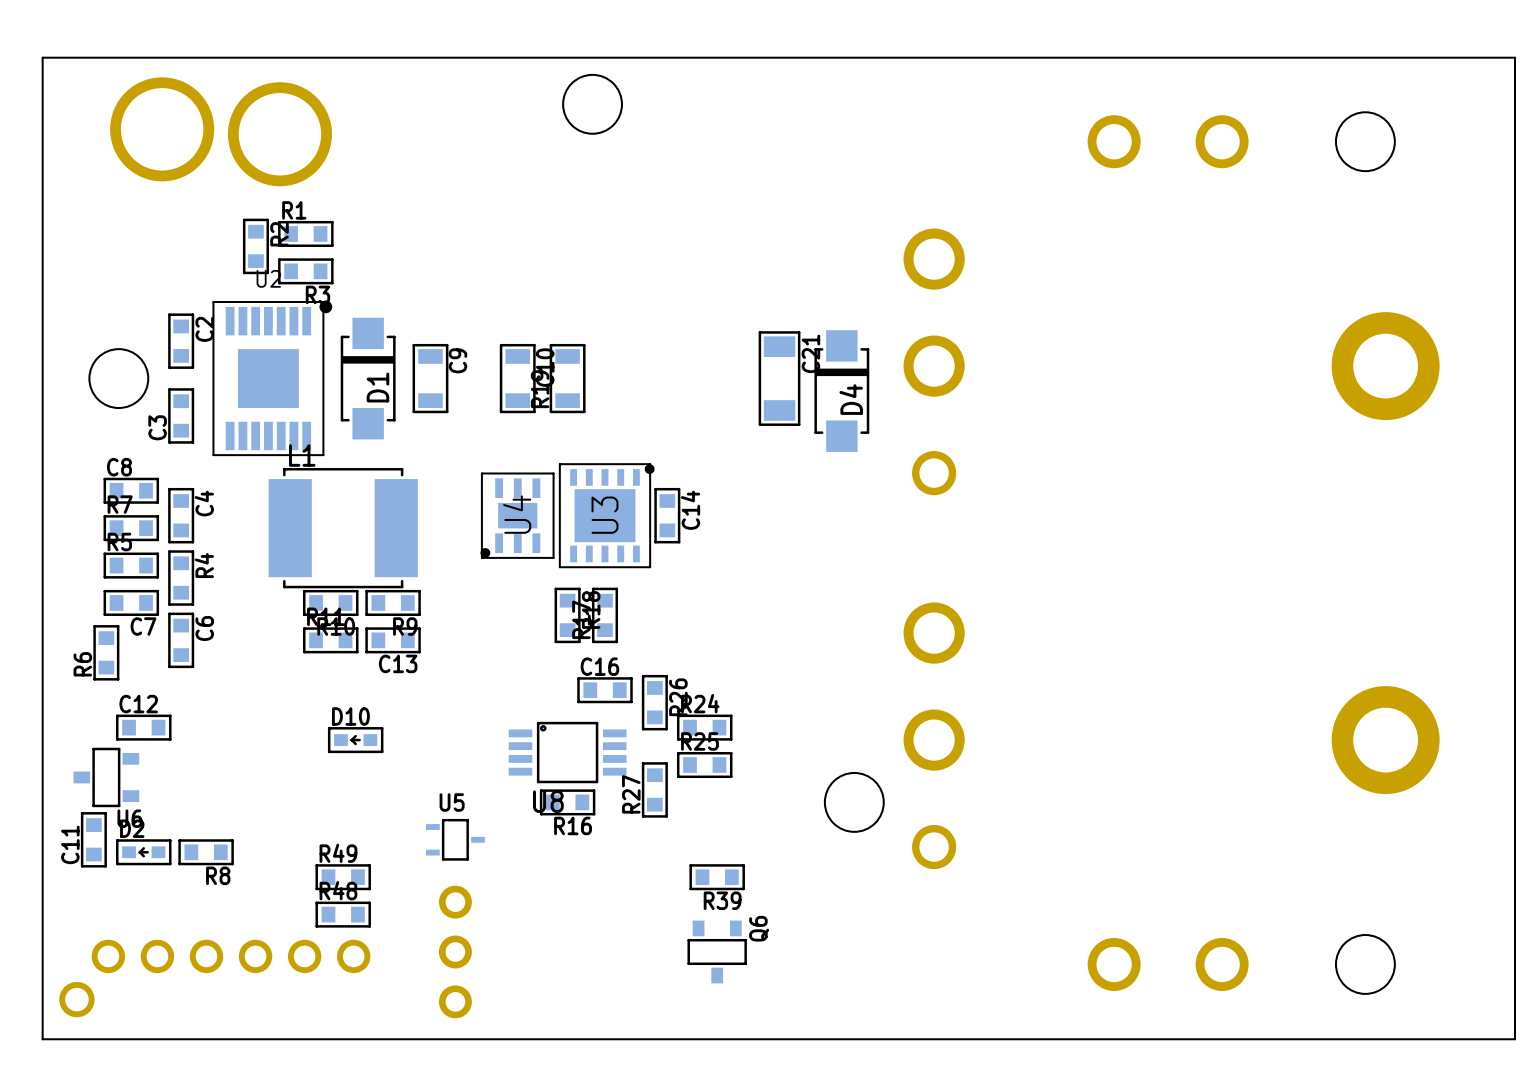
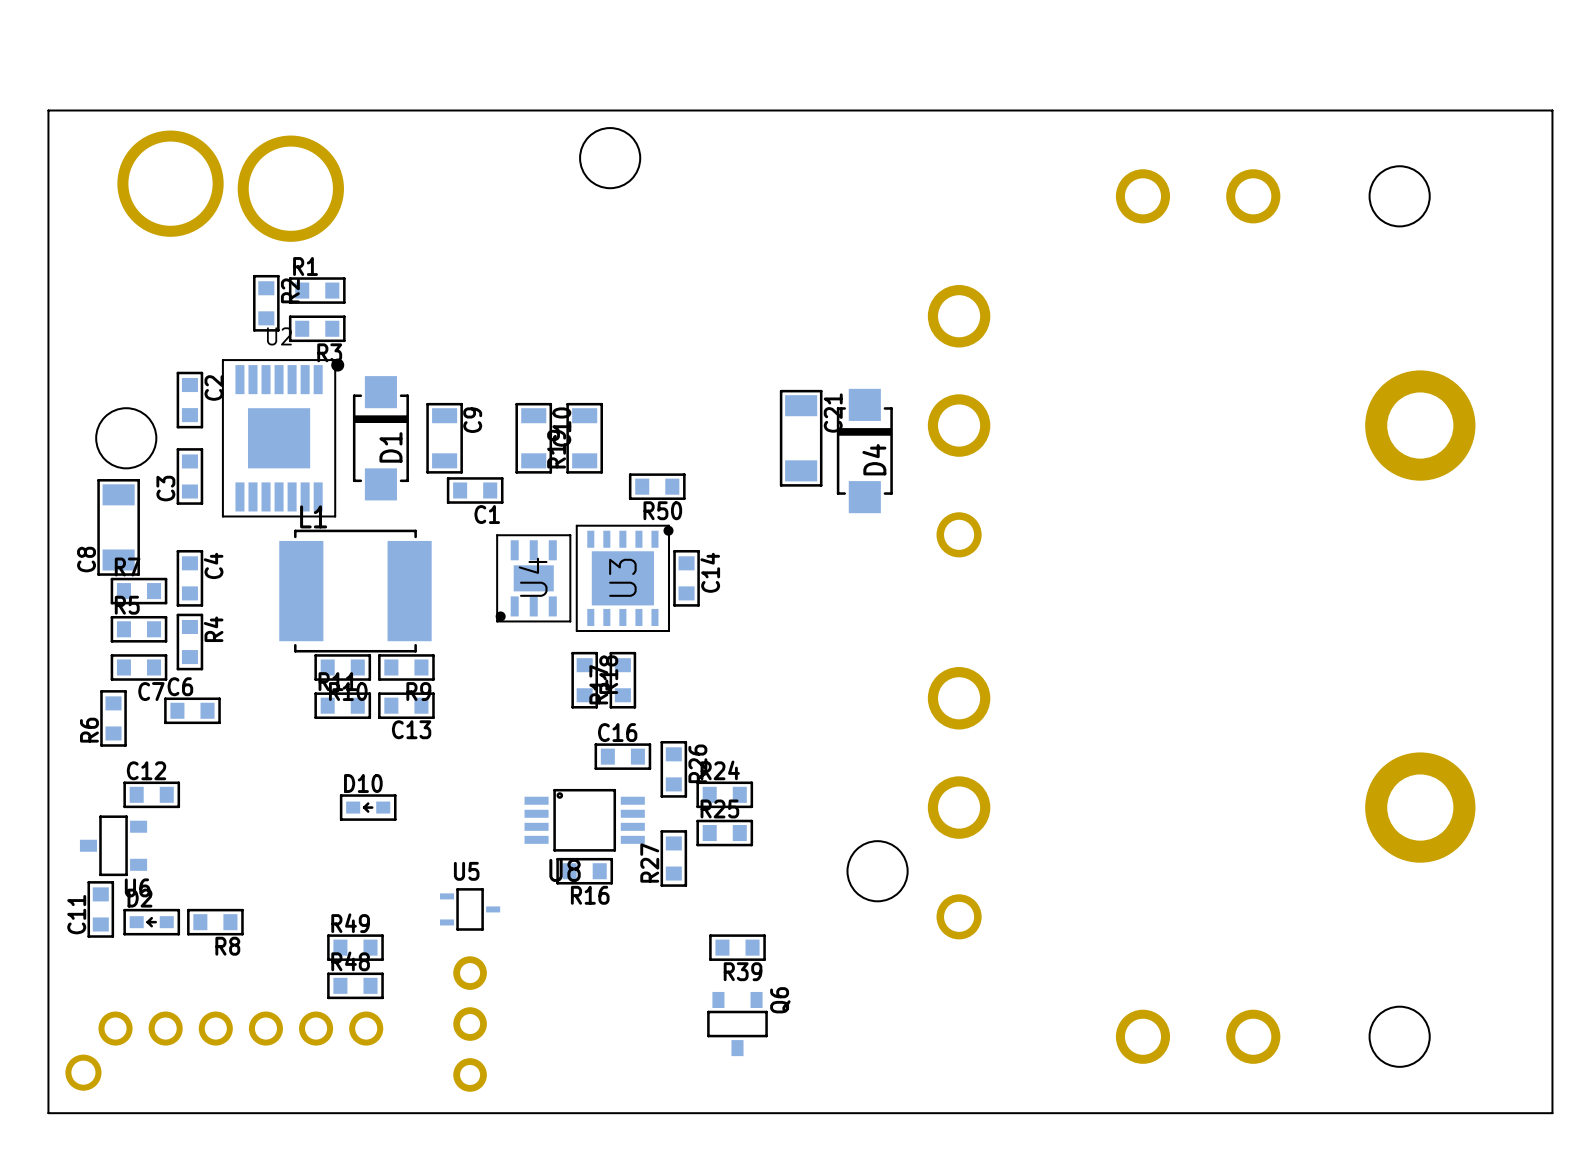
R50: none -> (657, 486)
C1: none -> (475, 490)
C8 name position: C8 (119, 467) -> C8 (86, 559)
C8 footprint: [103, 477, 160, 504] -> [97, 479, 140, 576]
C6 rotation: 0° (181, 640) -> 90° clockwise (192, 710)

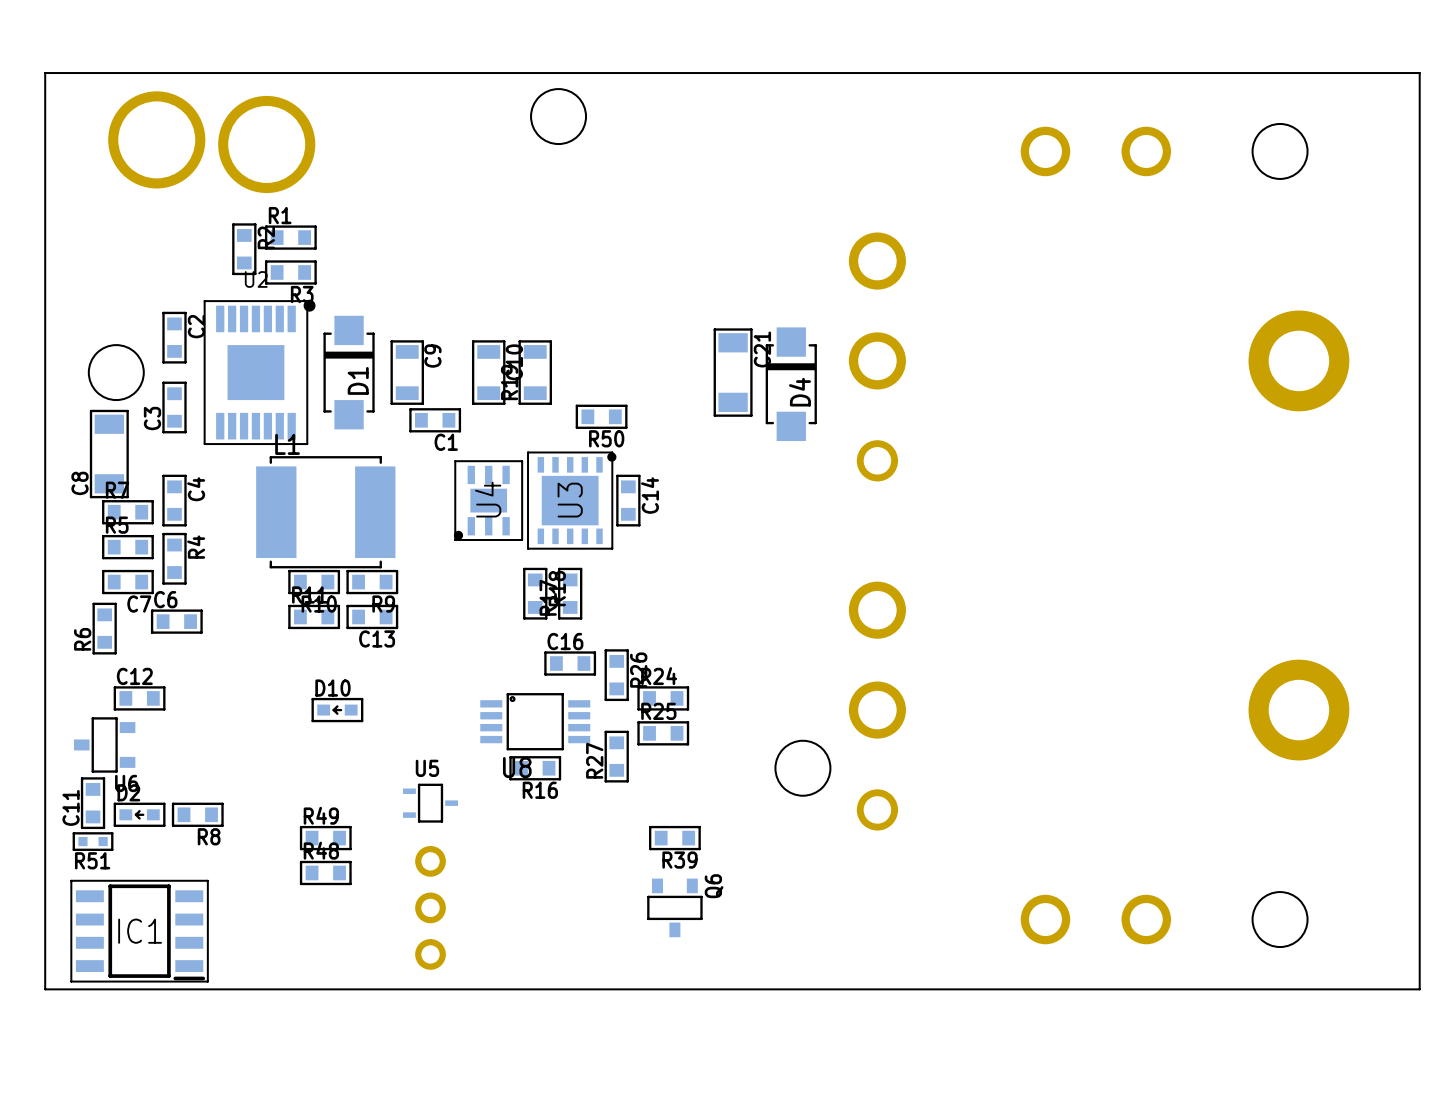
R51: none -> (93, 841)
IC1: none -> (139, 931)
part: (224, 1051) -> none

